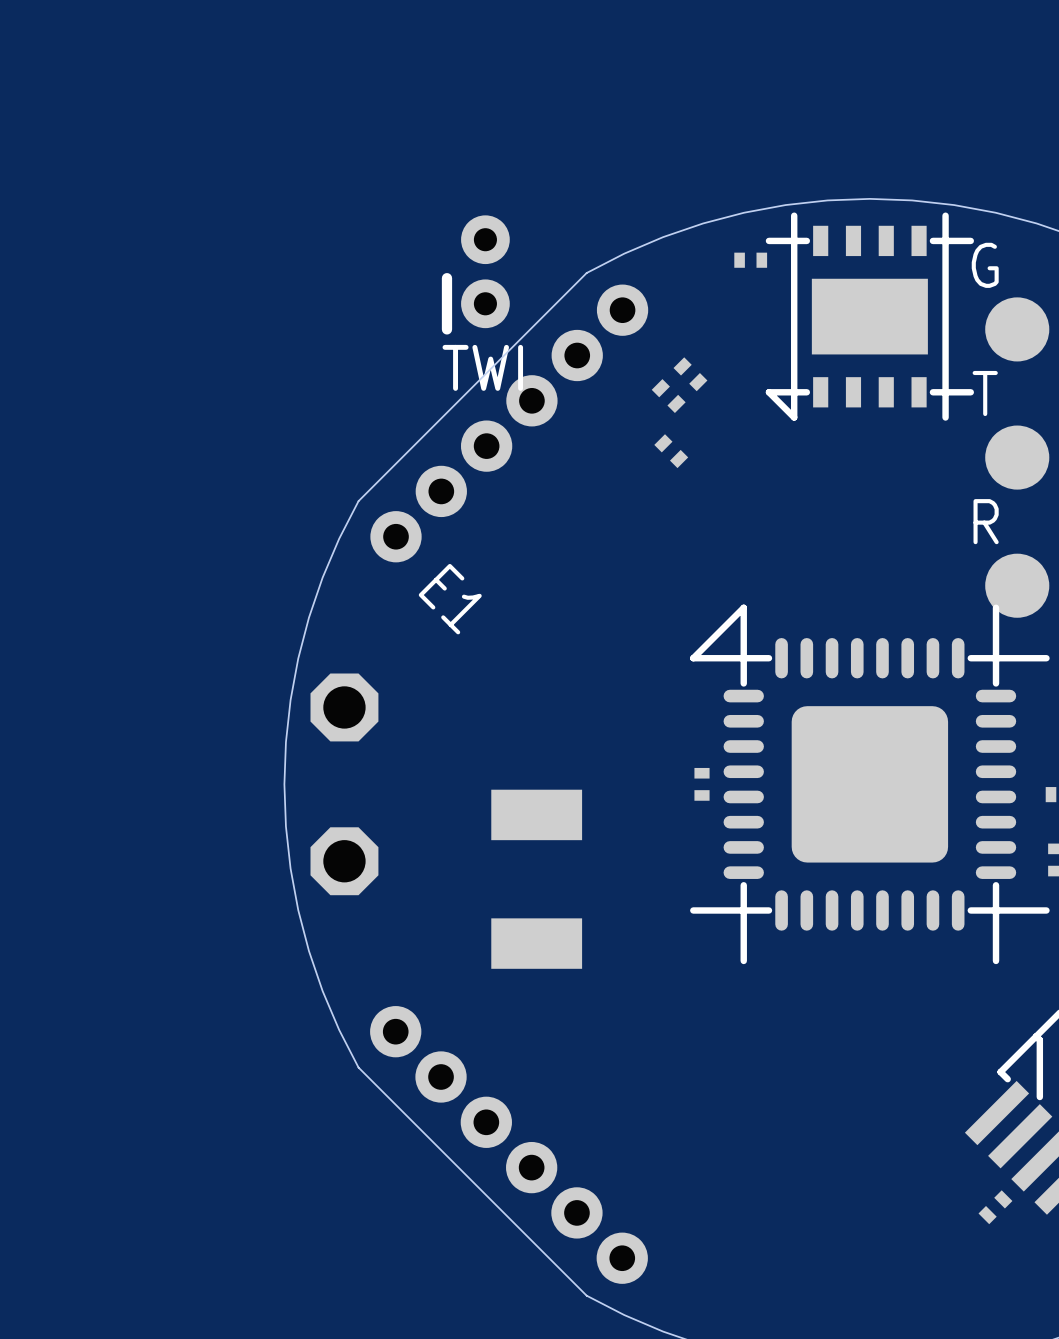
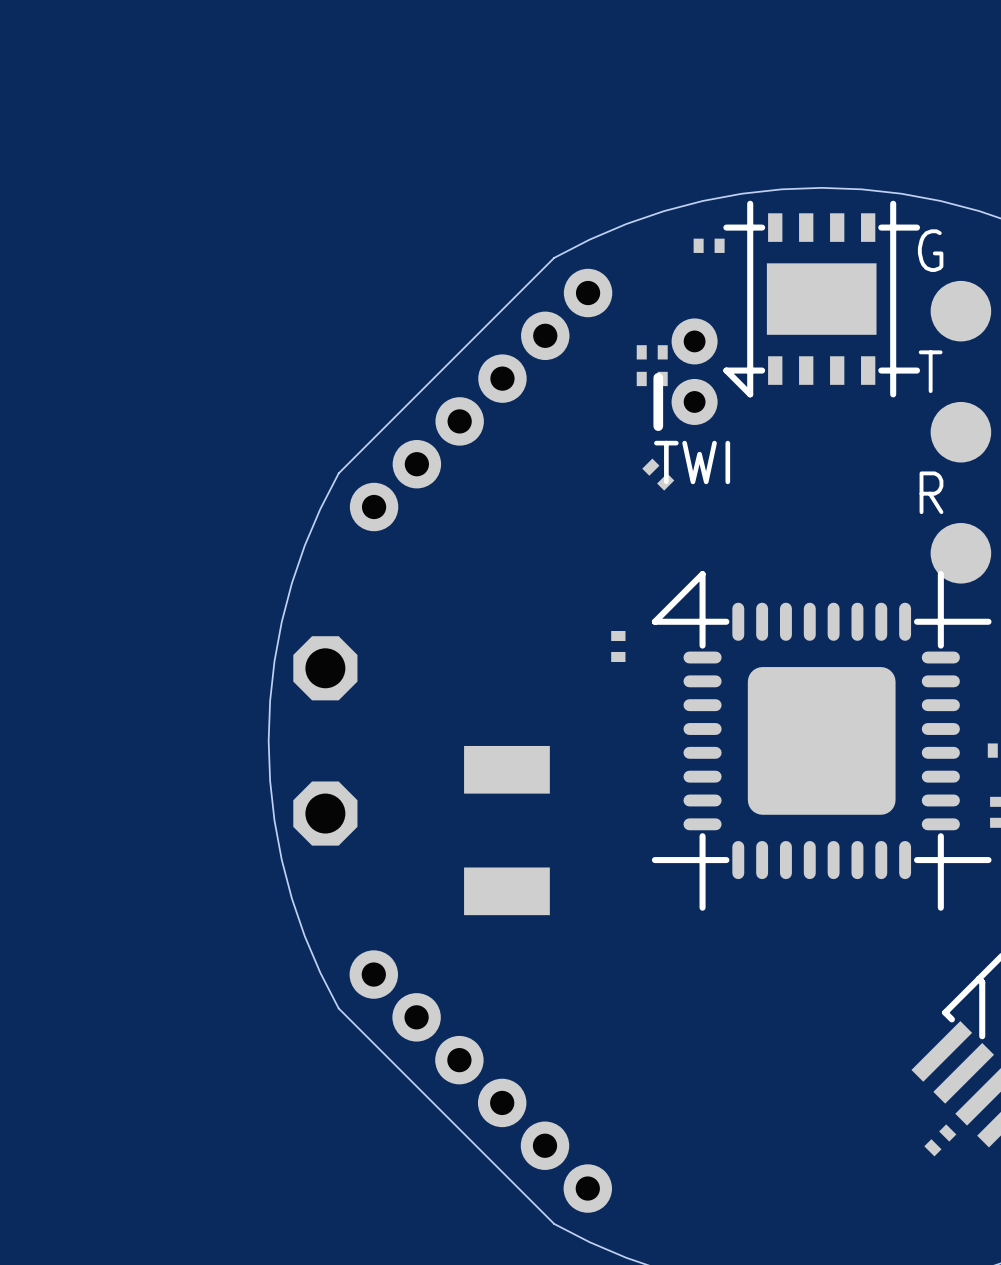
TWI position: (475, 274) -> (685, 374)
part rotation: 0° (690, 374) -> 45° counterclockwise (652, 352)
part: (668, 396) -> none
part: none -> (652, 378)
part: (671, 451) -> none
part: none -> (658, 474)
text: E1 (450, 599) -> none
part position: (702, 784) -> (618, 646)

